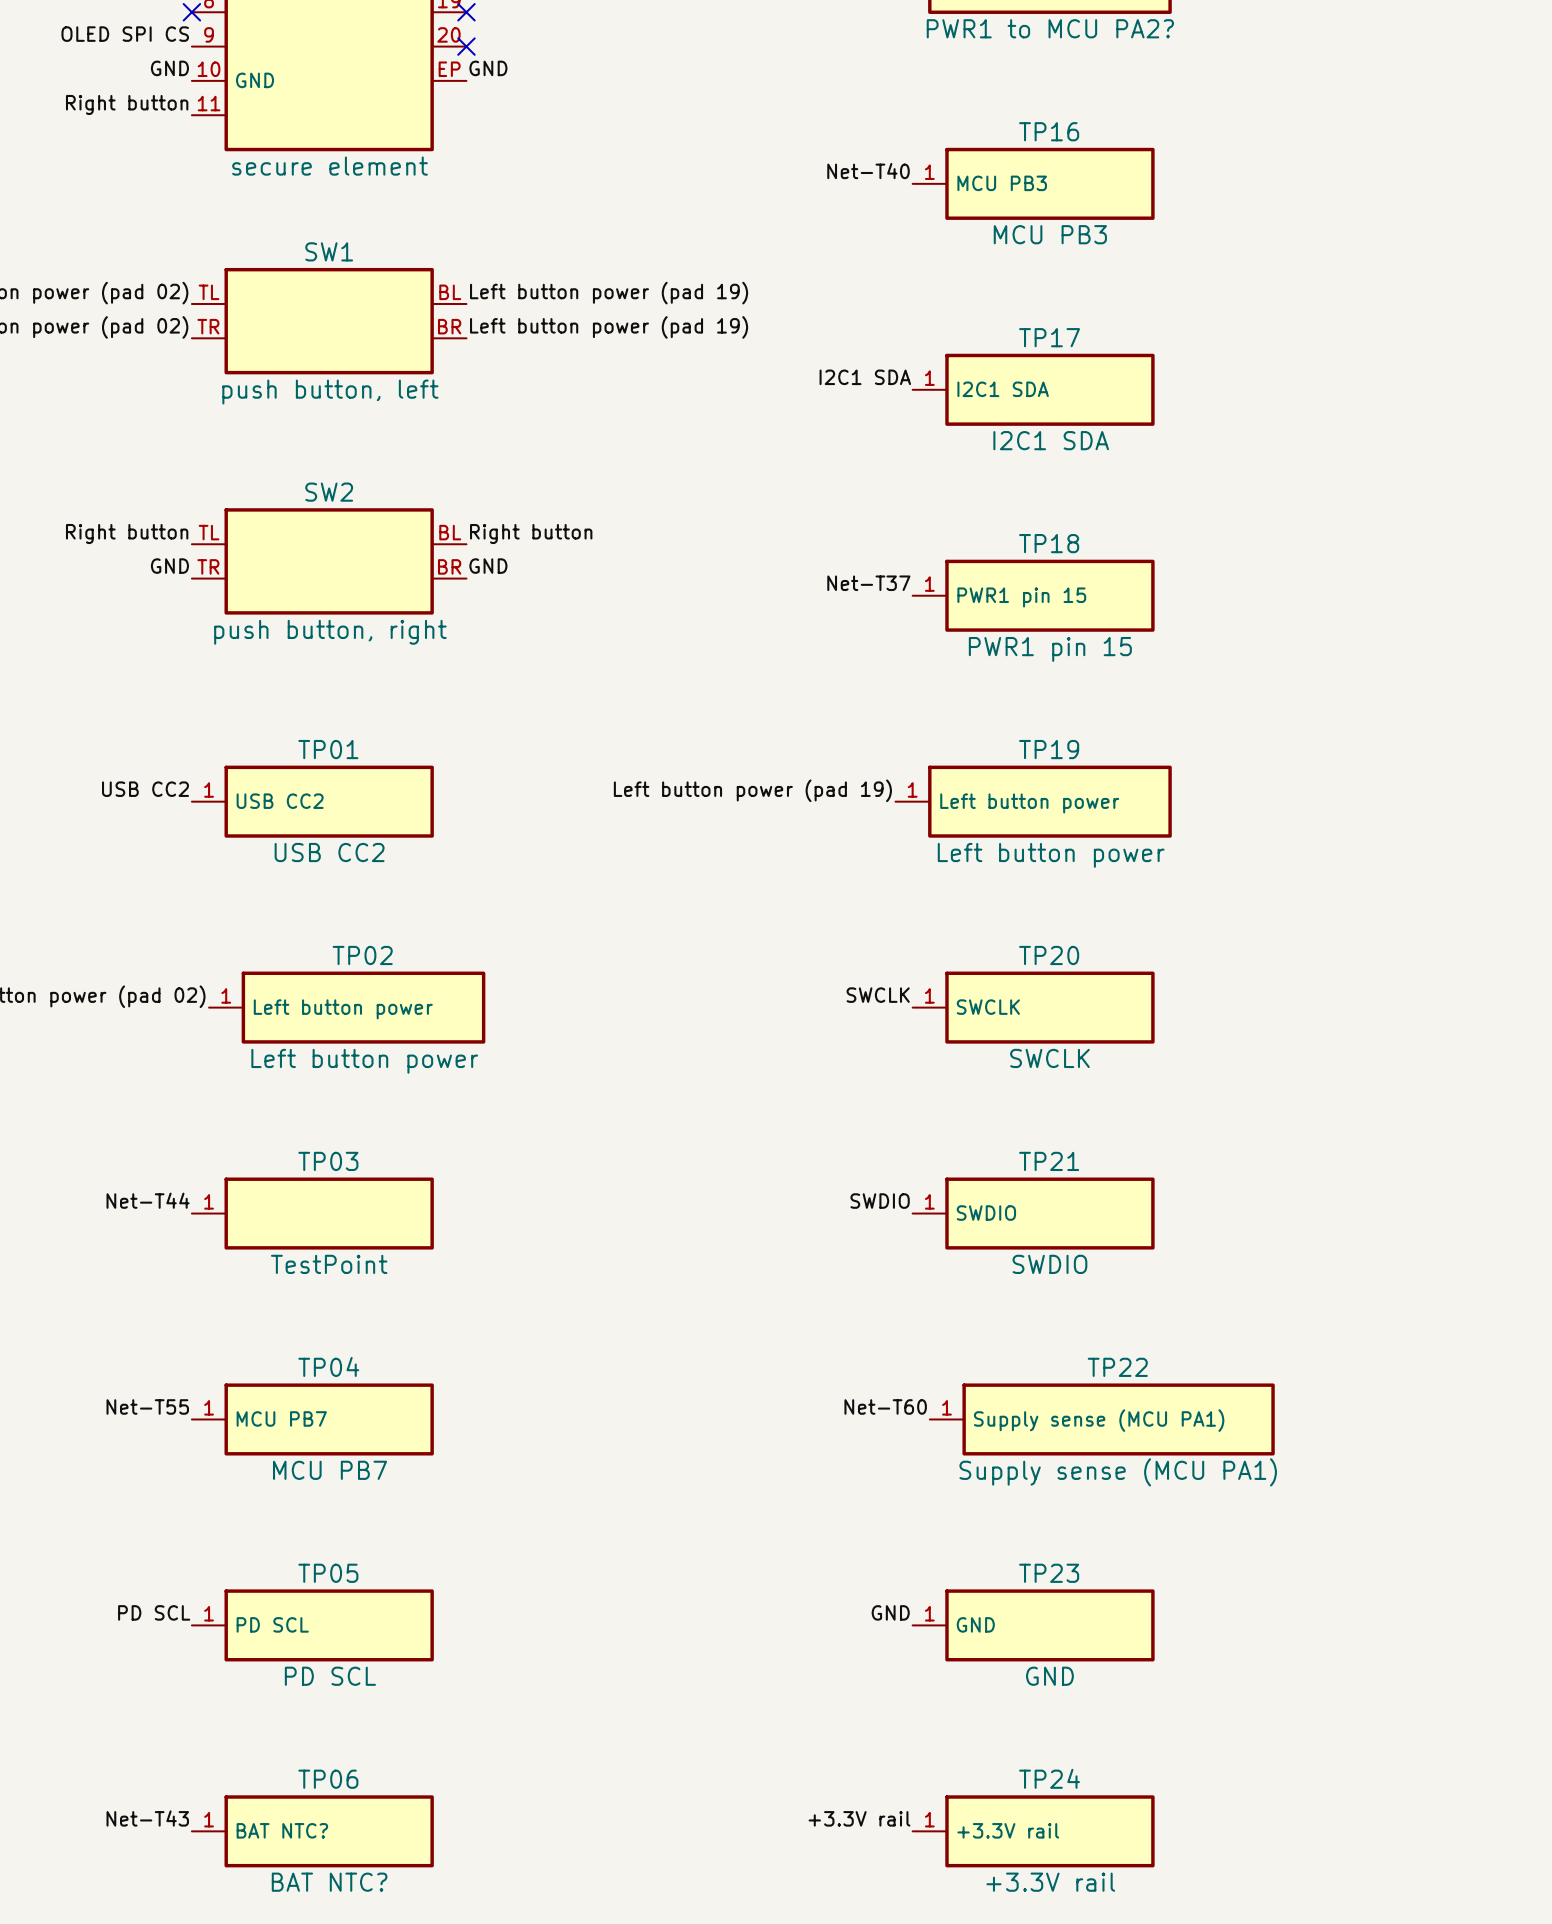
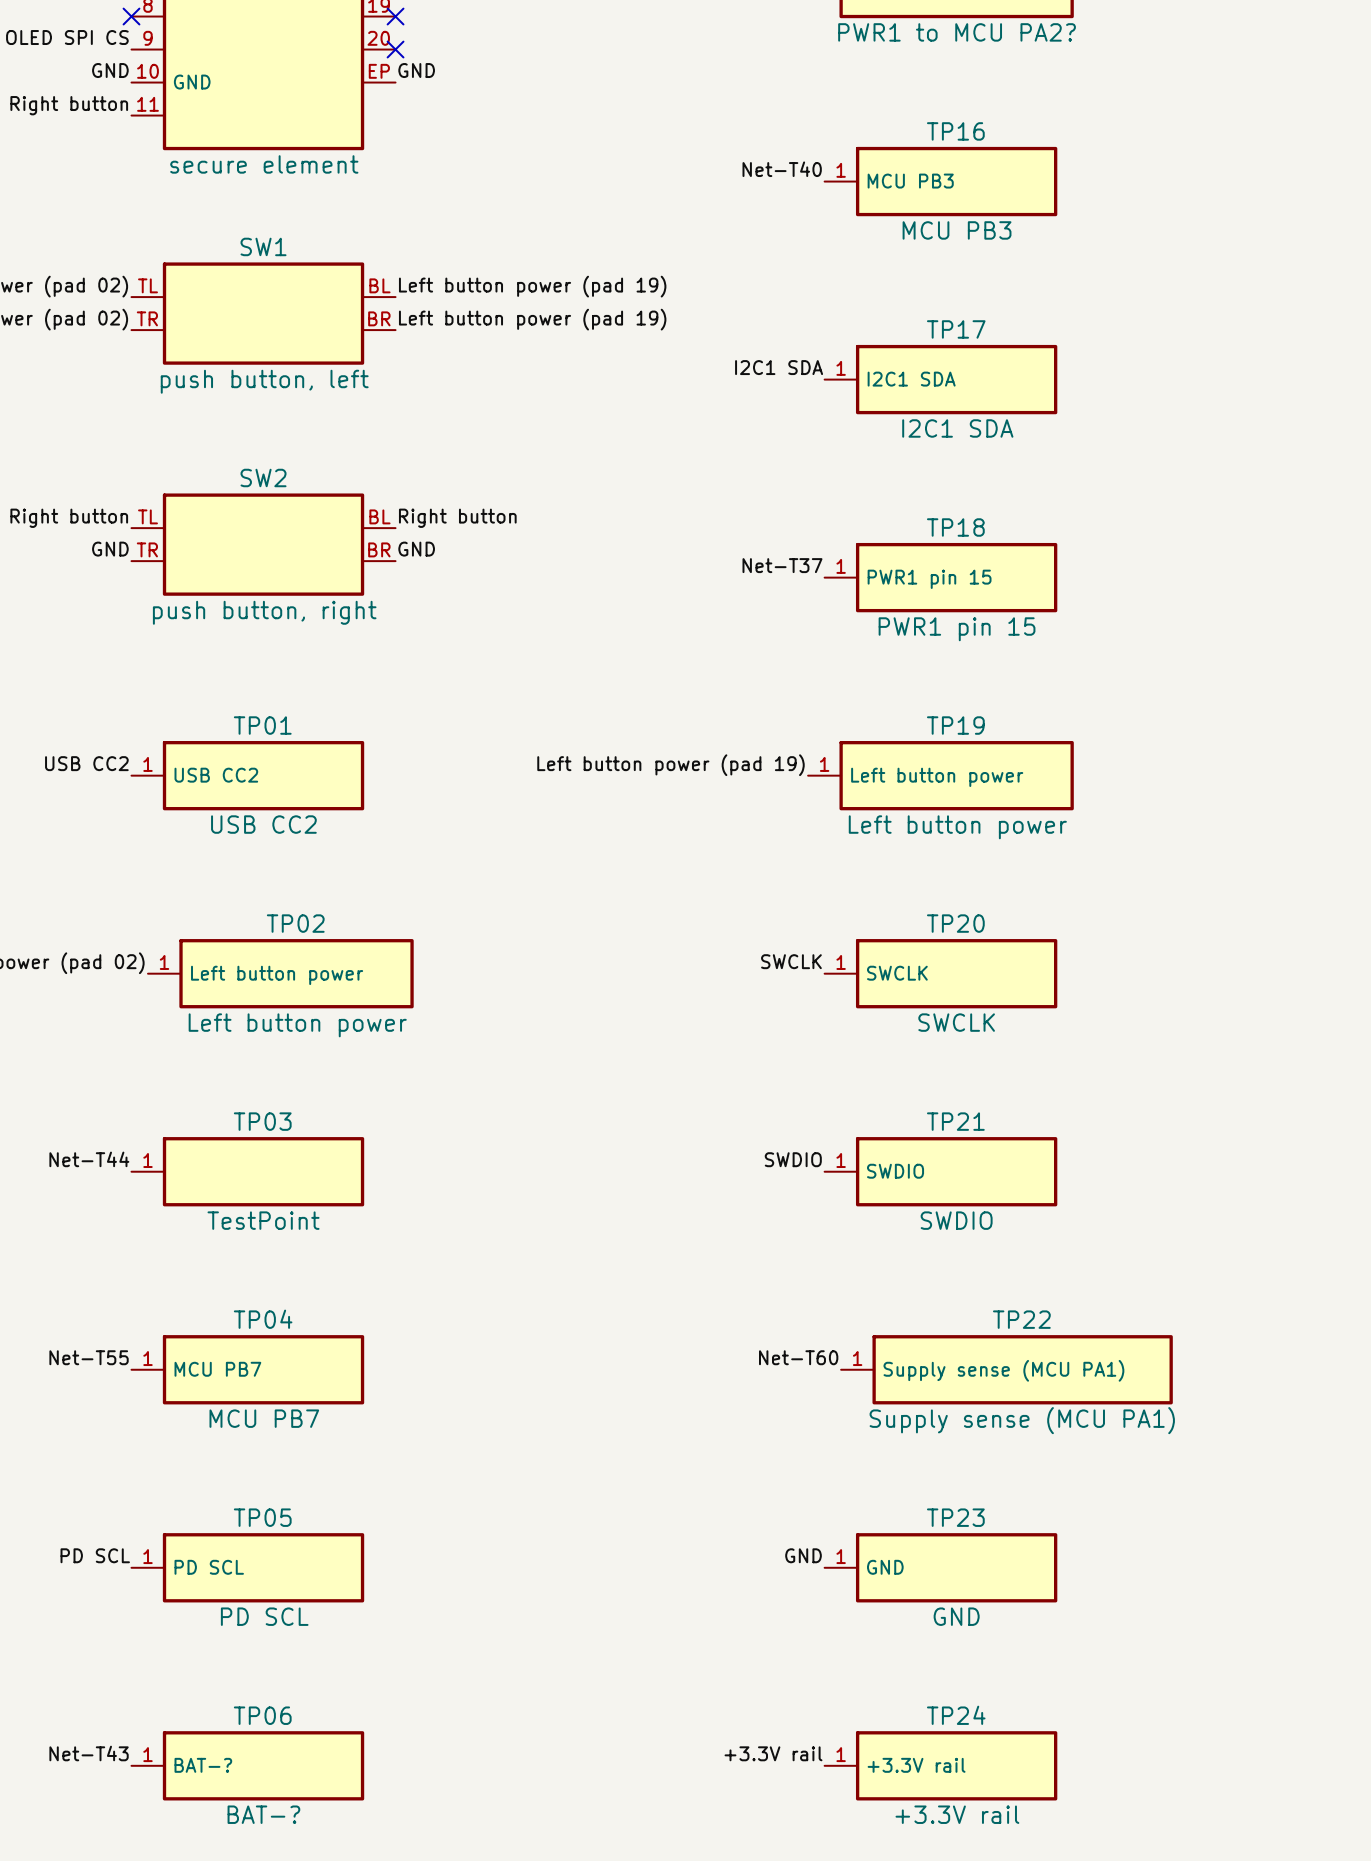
TP06 pin name: BAT NTC? (282, 1830) -> BAT-? (203, 1765)
TP06 value: BAT NTC? (329, 1882) -> BAT-? (263, 1814)

